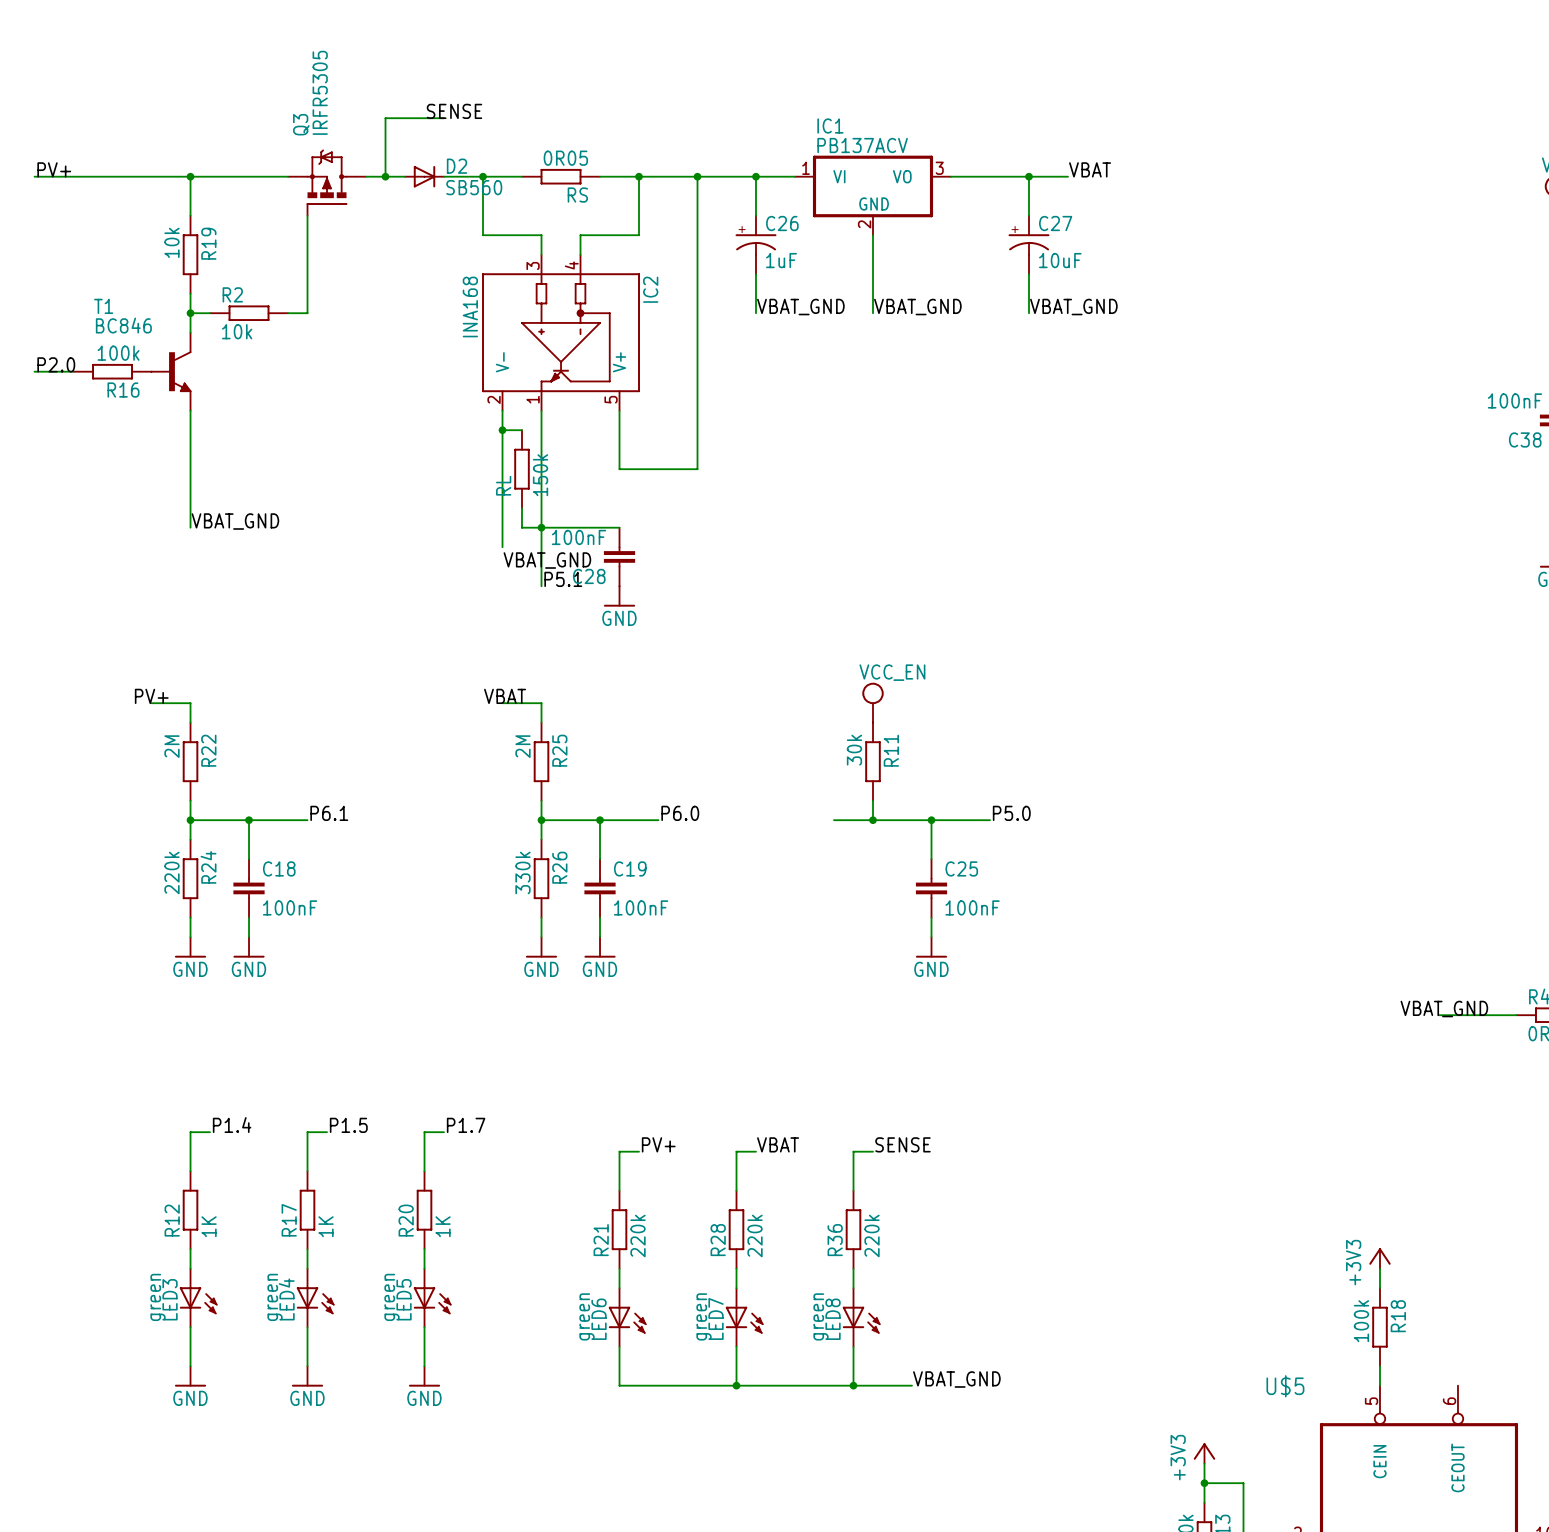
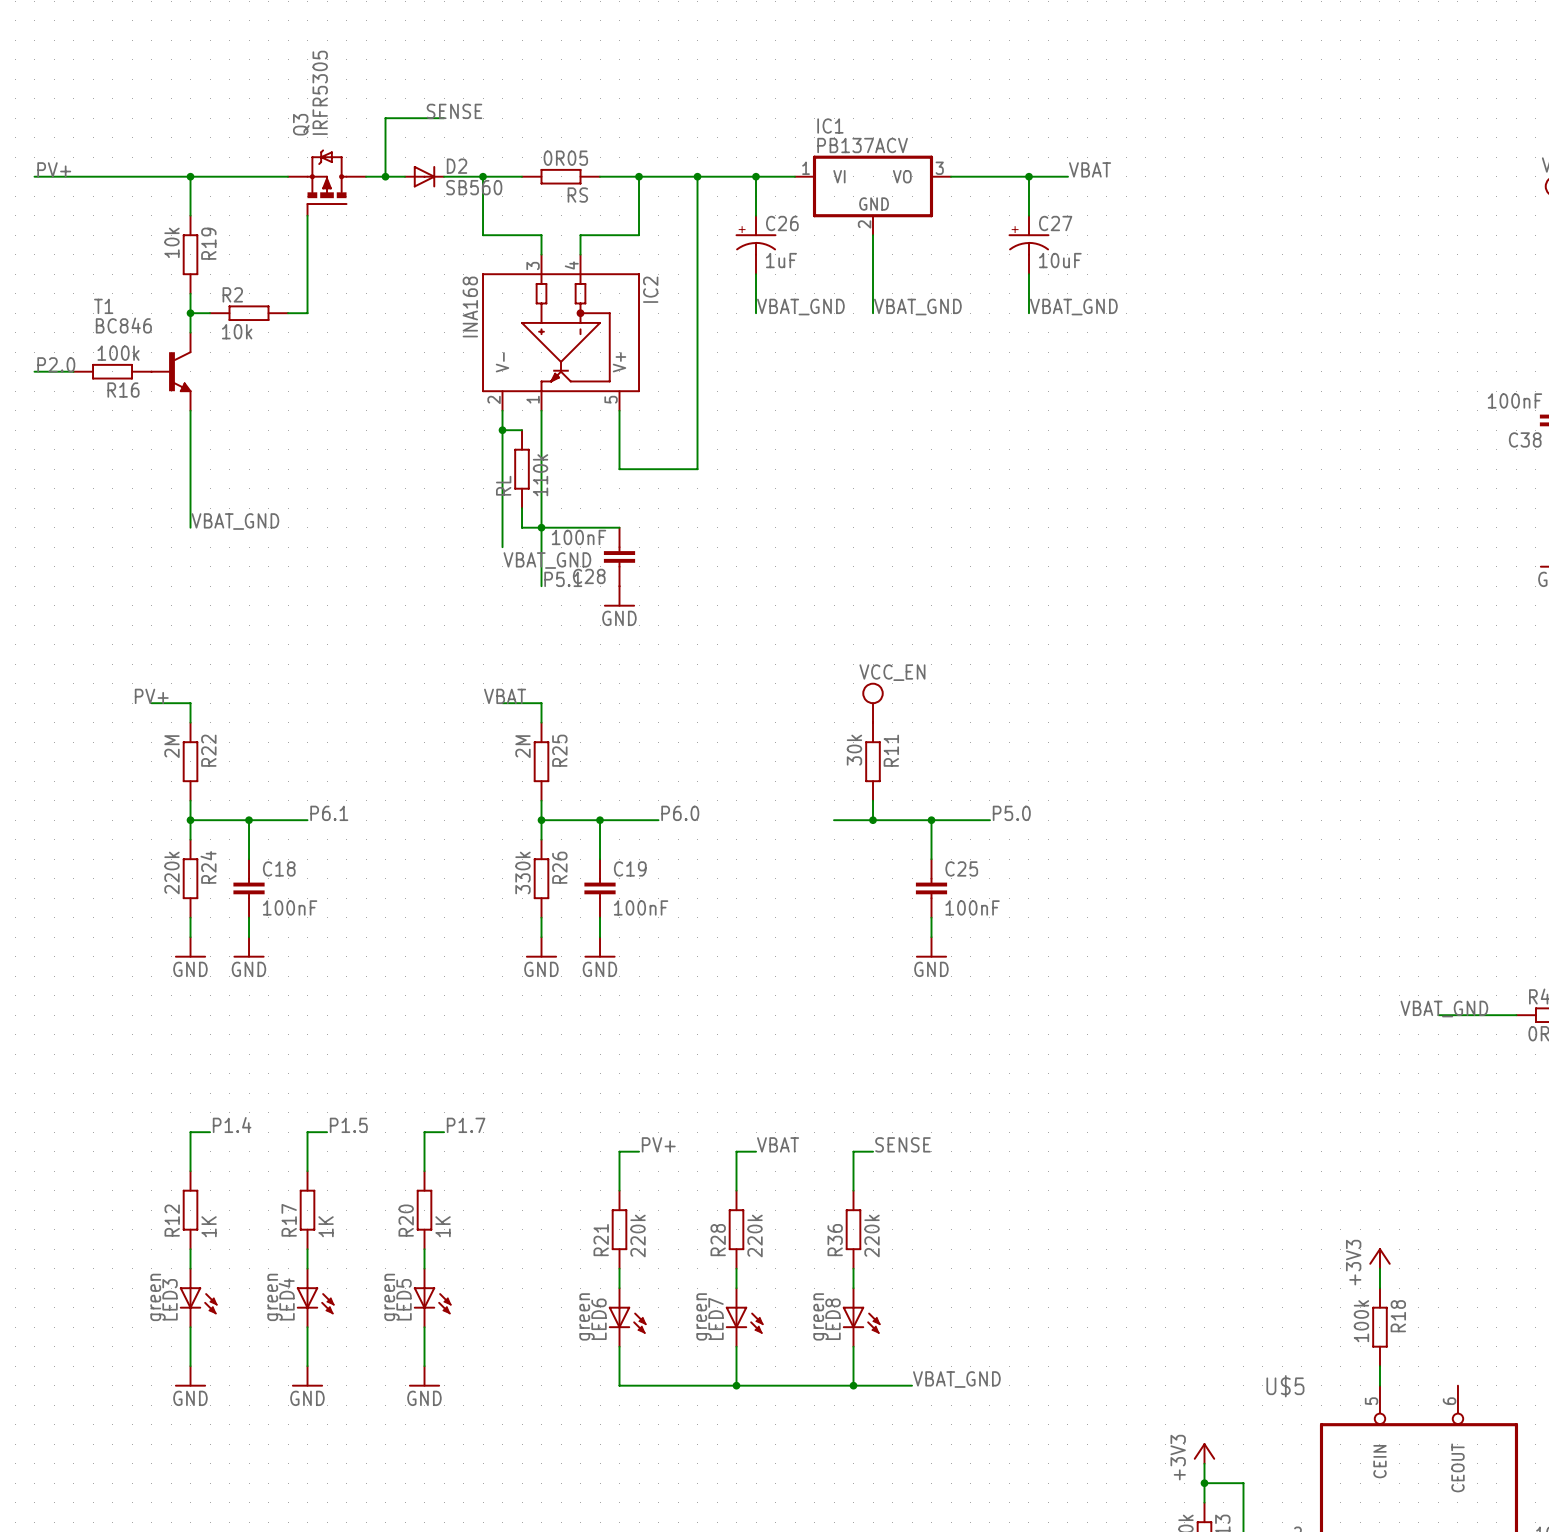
RL value: 150k (540, 475) -> 110k (540, 475)

